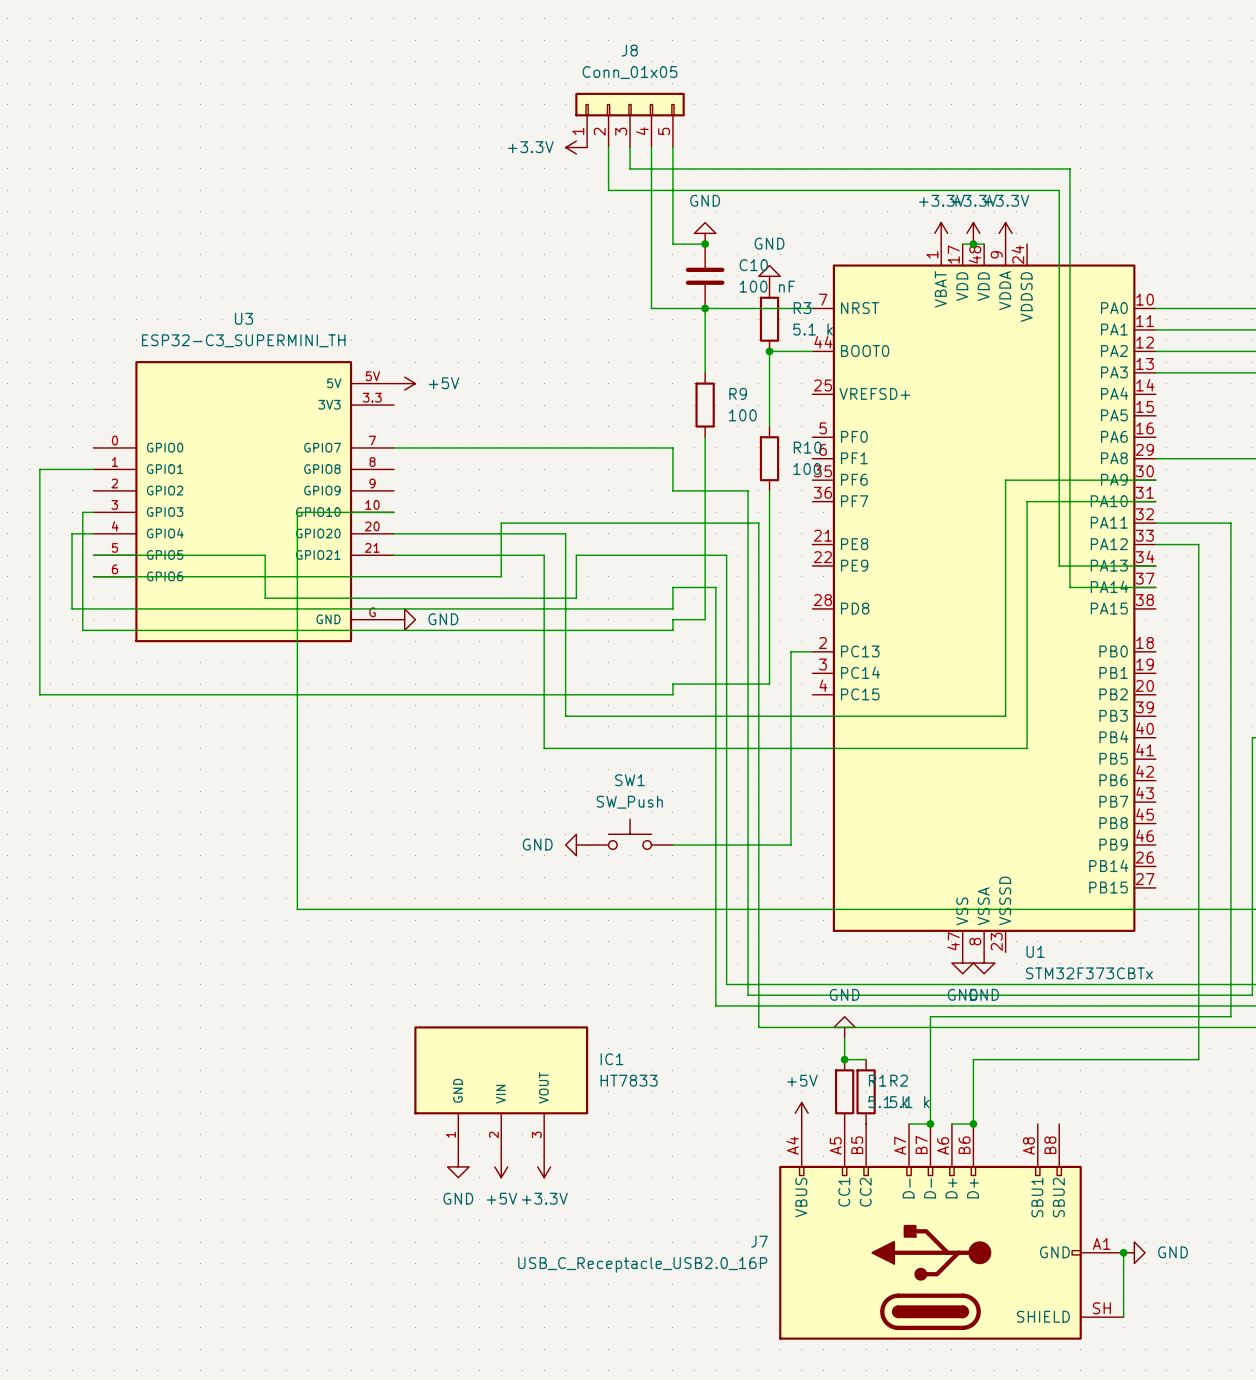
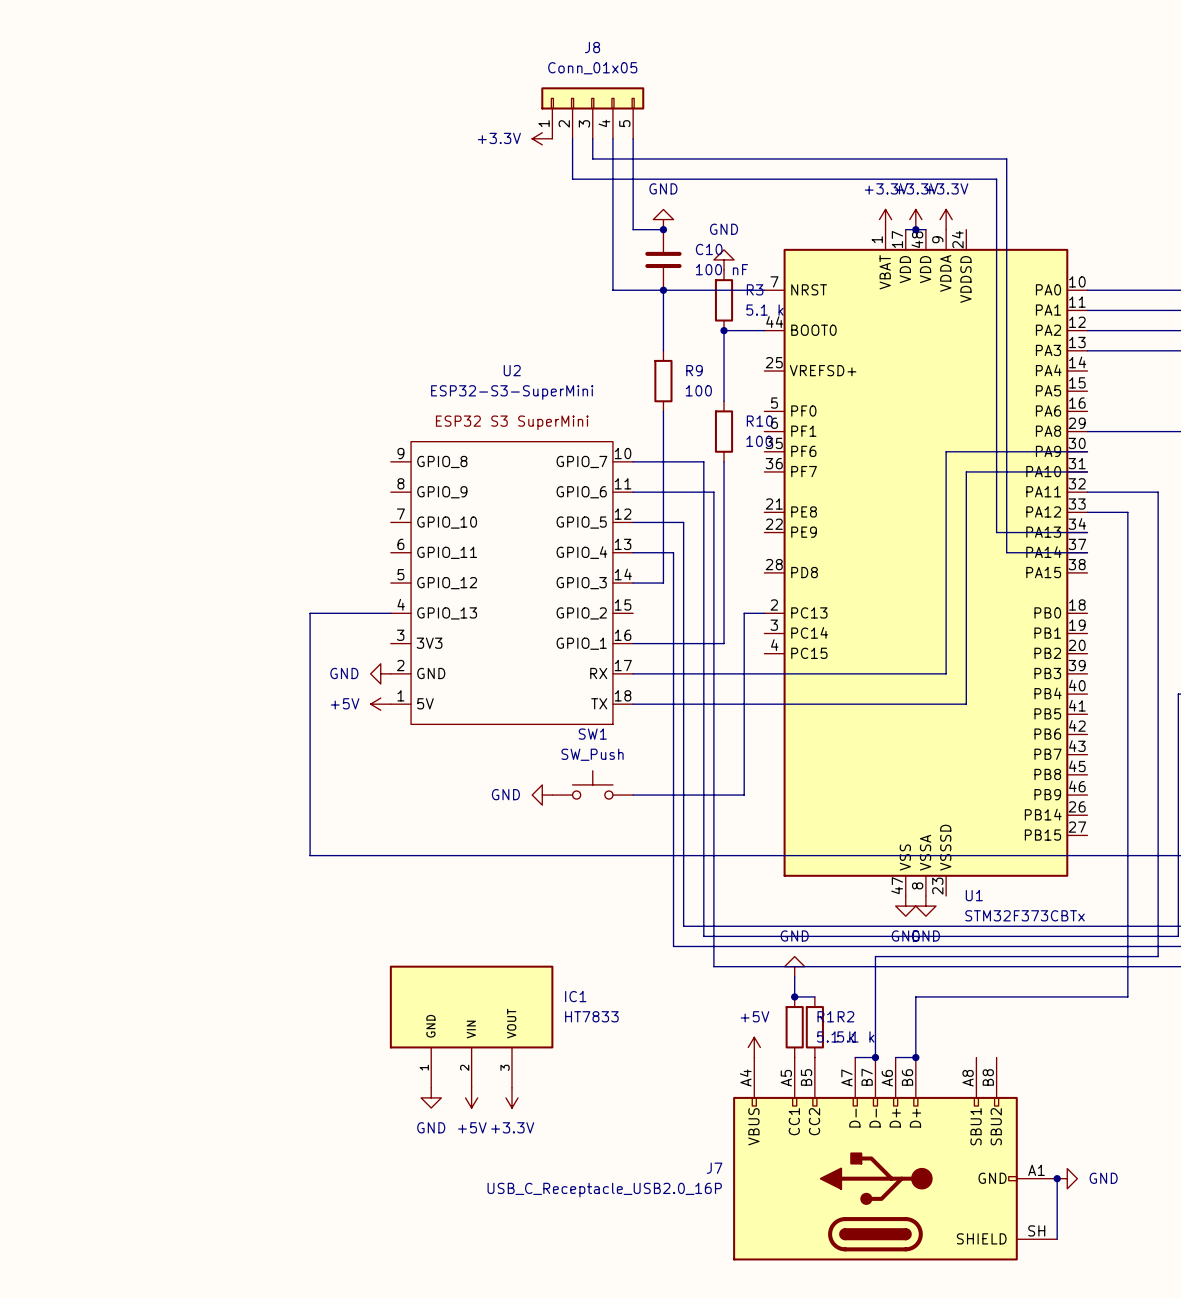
power symbol: +5V (404, 383) -> none
wire: (393, 447) (672, 447) (672, 490) -> none
wire: (93, 469) (39, 469) (39, 694) (672, 694) (672, 684) -> none
U3: ESP32-C3_SUPERMINI_TH (243, 501) -> none
wire: (93, 512) (82, 512) (82, 630) (672, 630) (672, 619) -> none
wire: (393, 512) (297, 512) (297, 909) (329, 909) -> (390, 613) (310, 613) (310, 855)
wire: (672, 523) (501, 523) (501, 576) (93, 576) -> none
wire: (93, 533) (72, 533) (72, 608) (672, 608) (672, 587) -> none
wire: (393, 533) (565, 533) (565, 716) (672, 716) -> none
wire: (93, 555) (265, 555) (265, 598) (576, 598) (576, 555) (672, 555) -> none
wire: (393, 555) (544, 555) (544, 748) (672, 748) -> none
power symbol rotation: 0° (404, 619) -> 180° (380, 673)
power symbol position: GND (404, 619) -> GND (380, 673)
U2: none -> ESP32-S3-SuperMini (511, 583)
power symbol: none -> +5V (380, 704)

